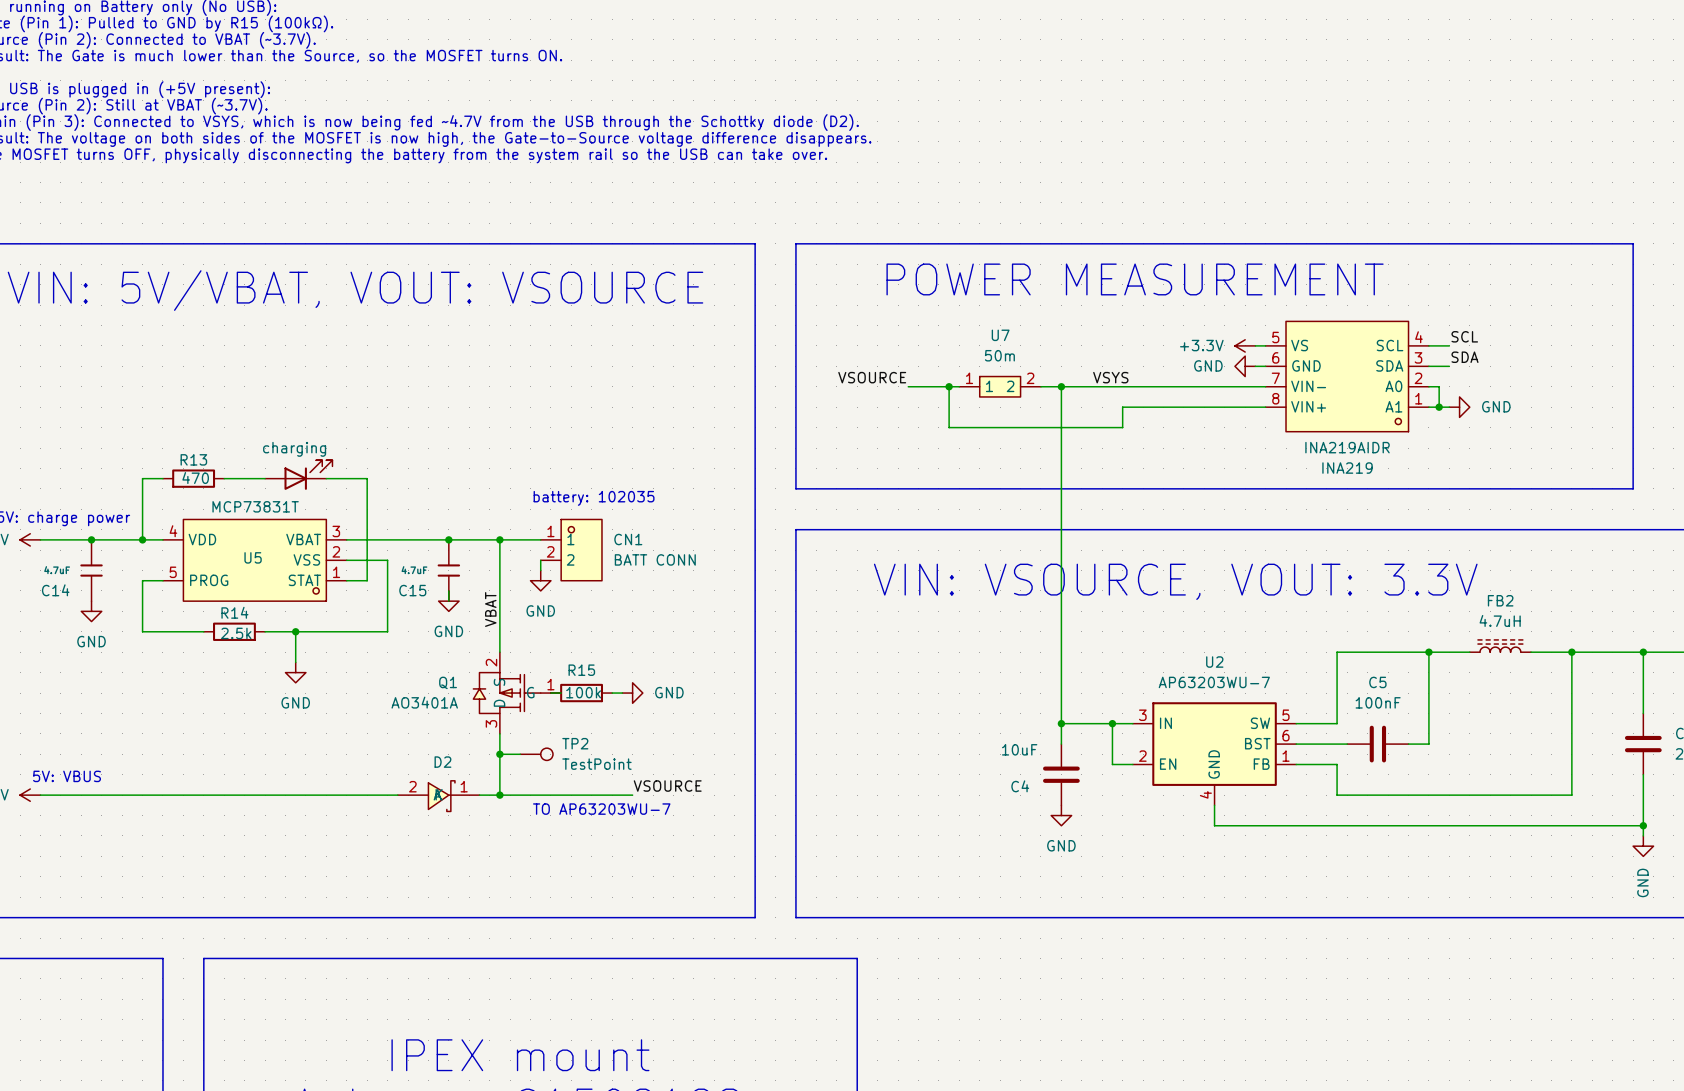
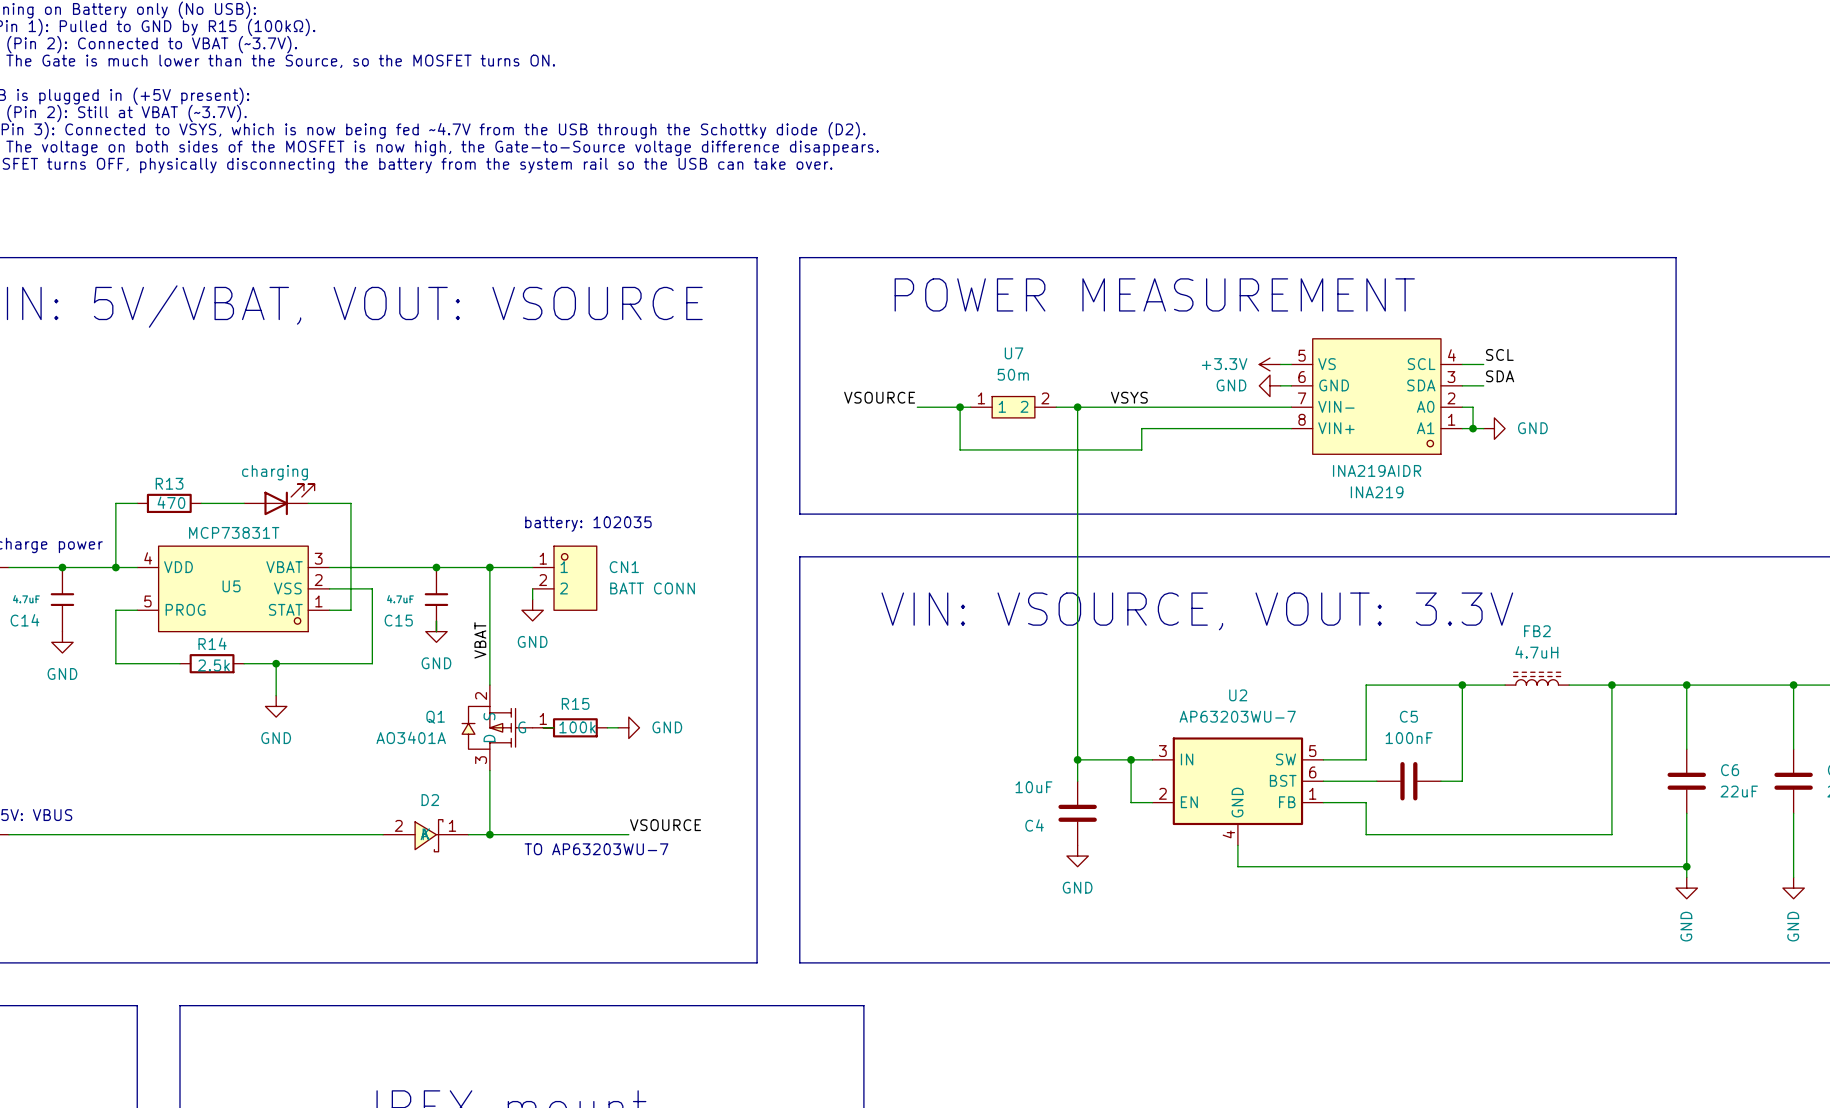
wire: (499, 754) (520, 754) -> none
junction: (499, 754) -> none
TP2: TestPoint (536, 754) -> none

